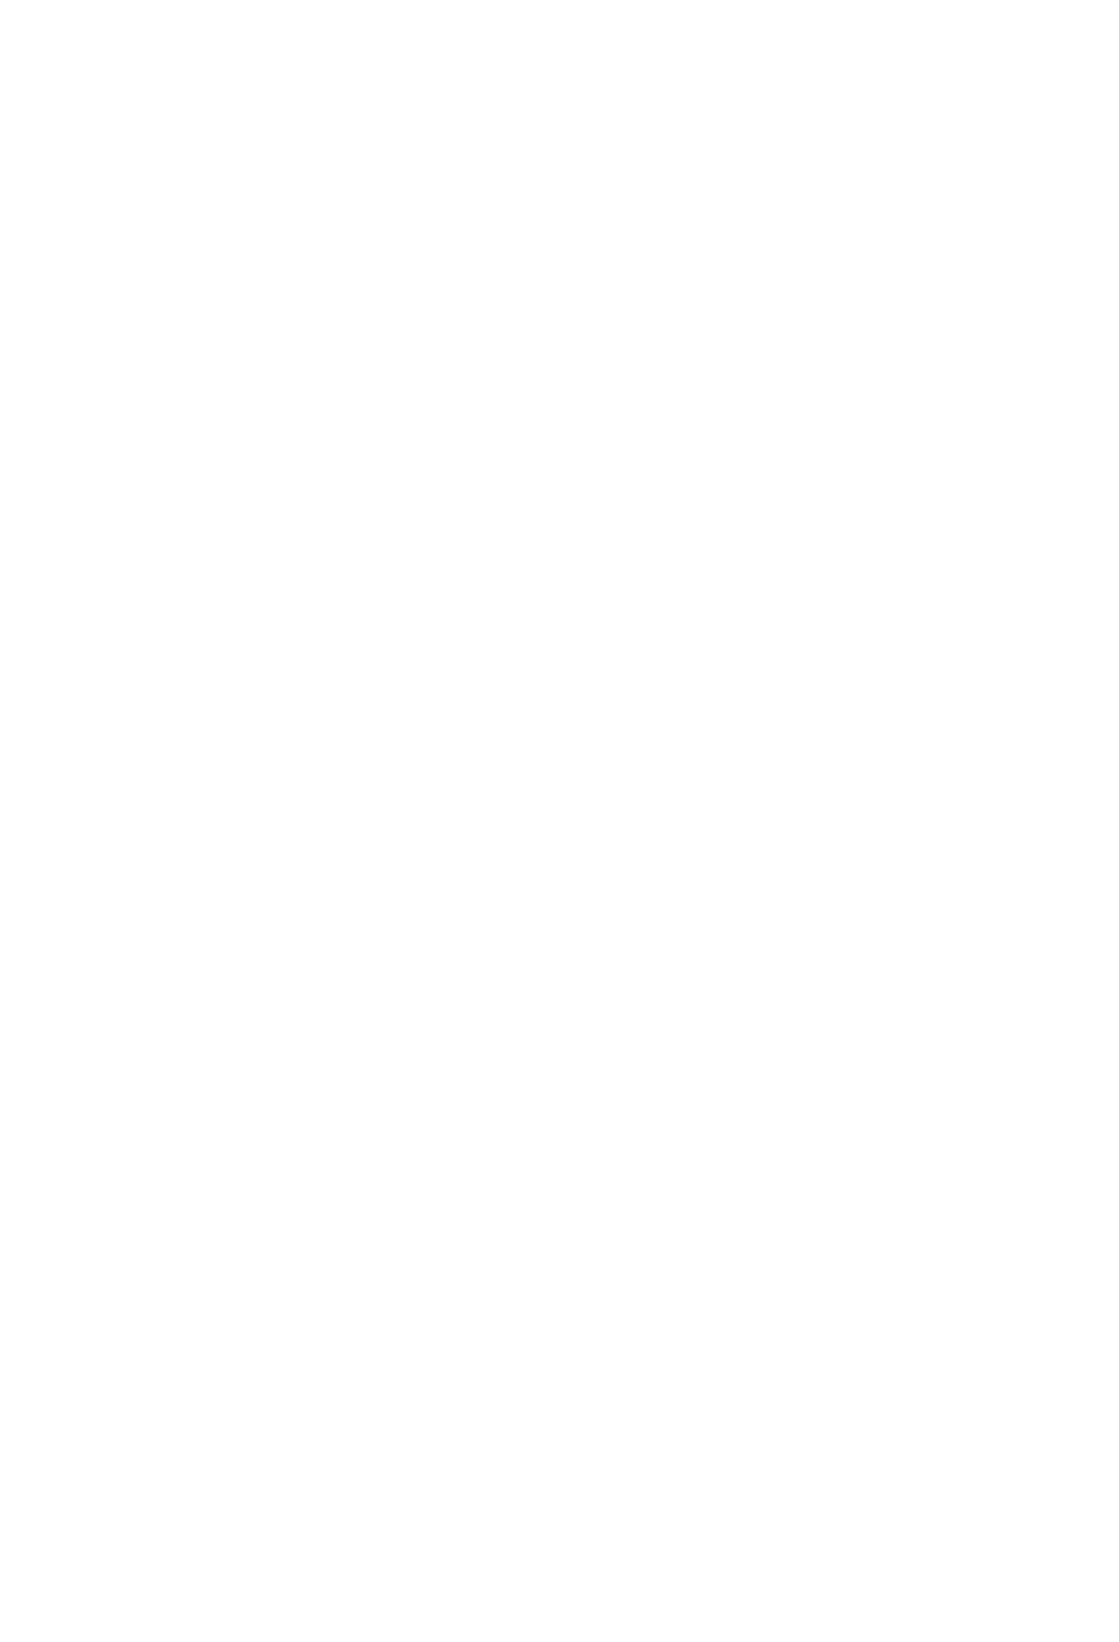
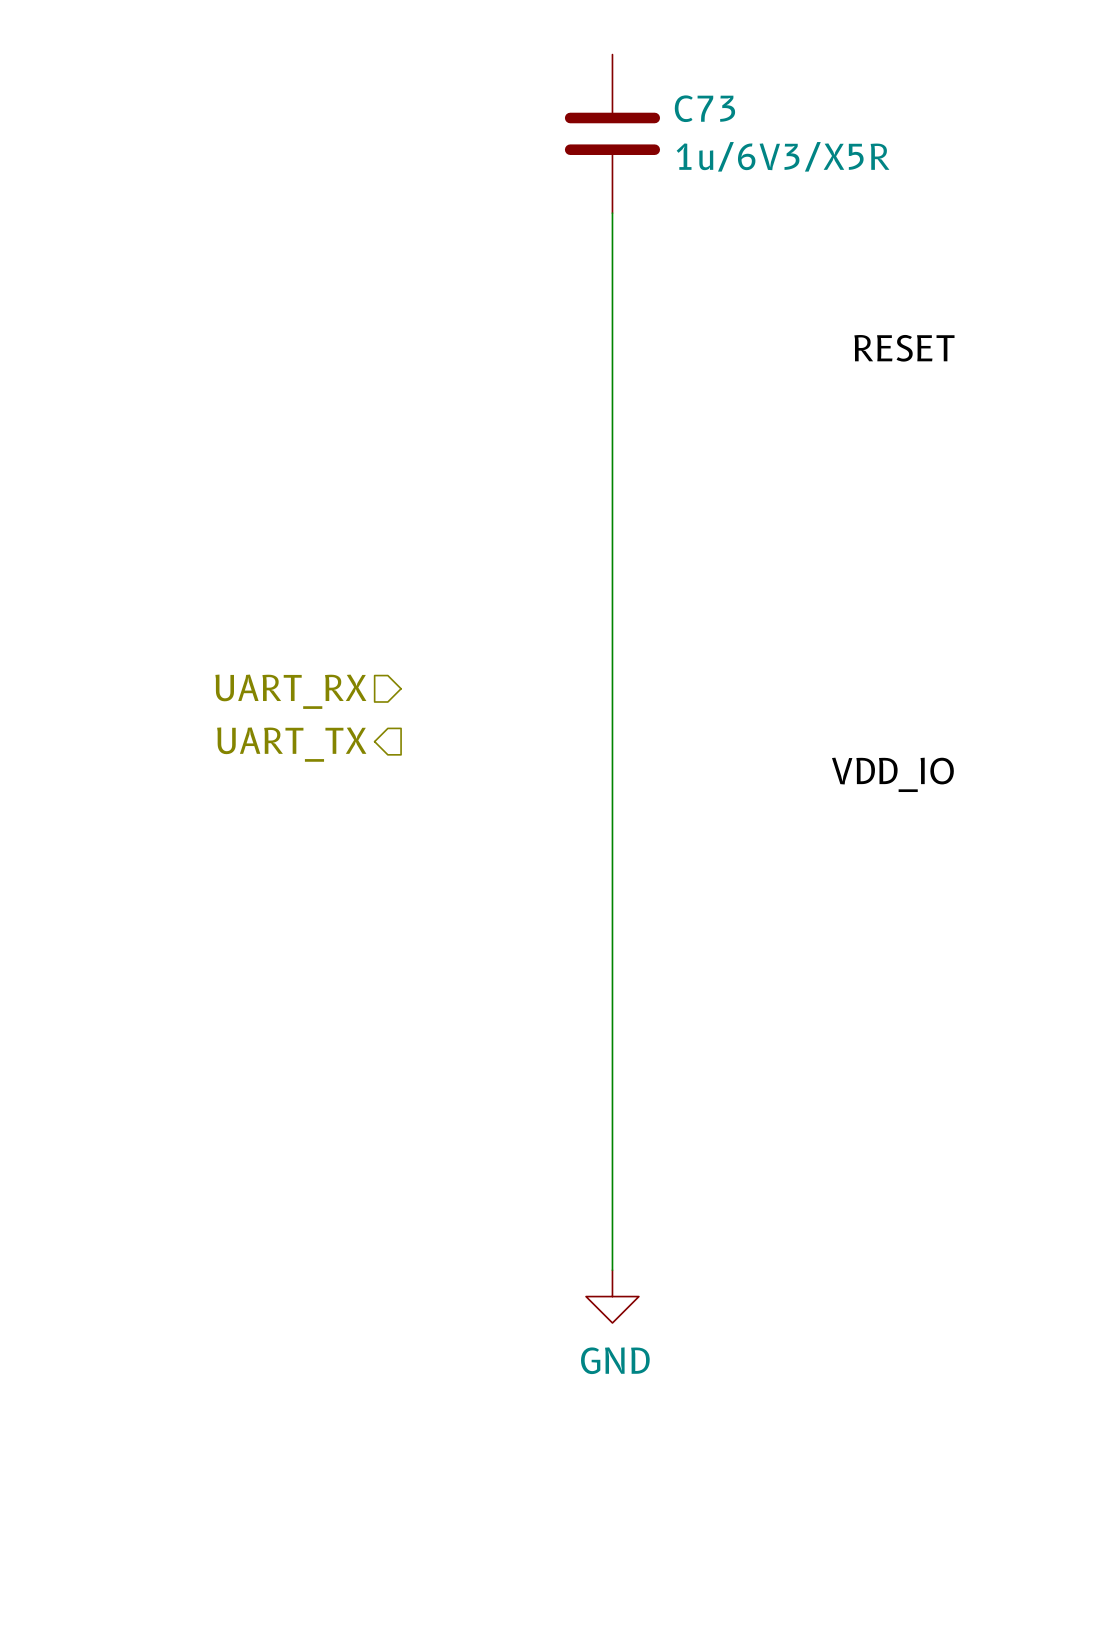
C73: none -> 1u/6V3/X5R (612, 133)
wire: none -> (612, 213) (612, 1270)
label: none -> RESET (904, 348)
hierarchical label: none -> UART_RX (290, 691)
hierarchical label: none -> UART_TX (291, 744)
label: none -> VDD_IO (892, 774)
power symbol: none -> GND (612, 1296)

